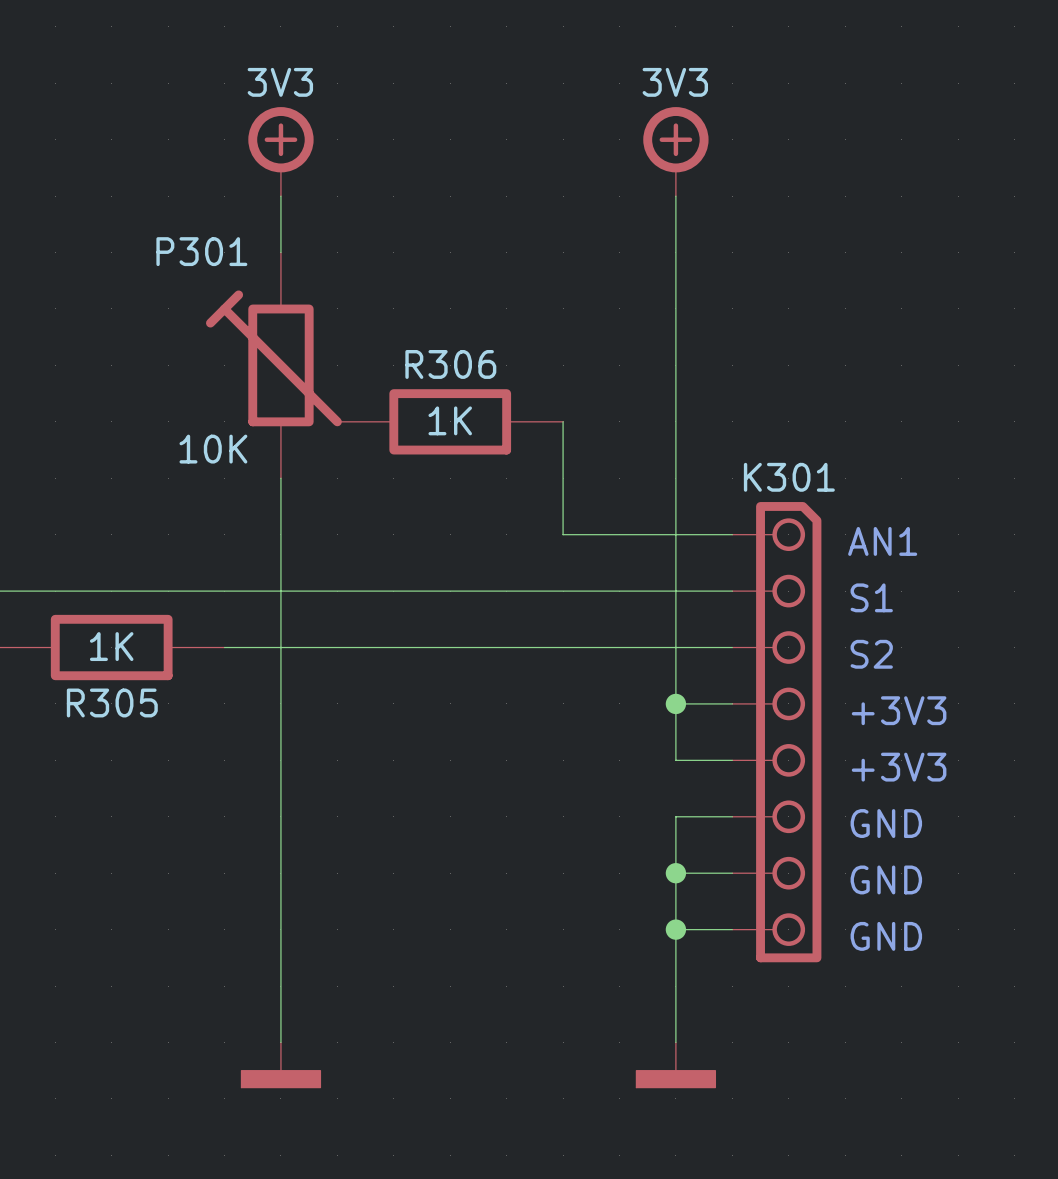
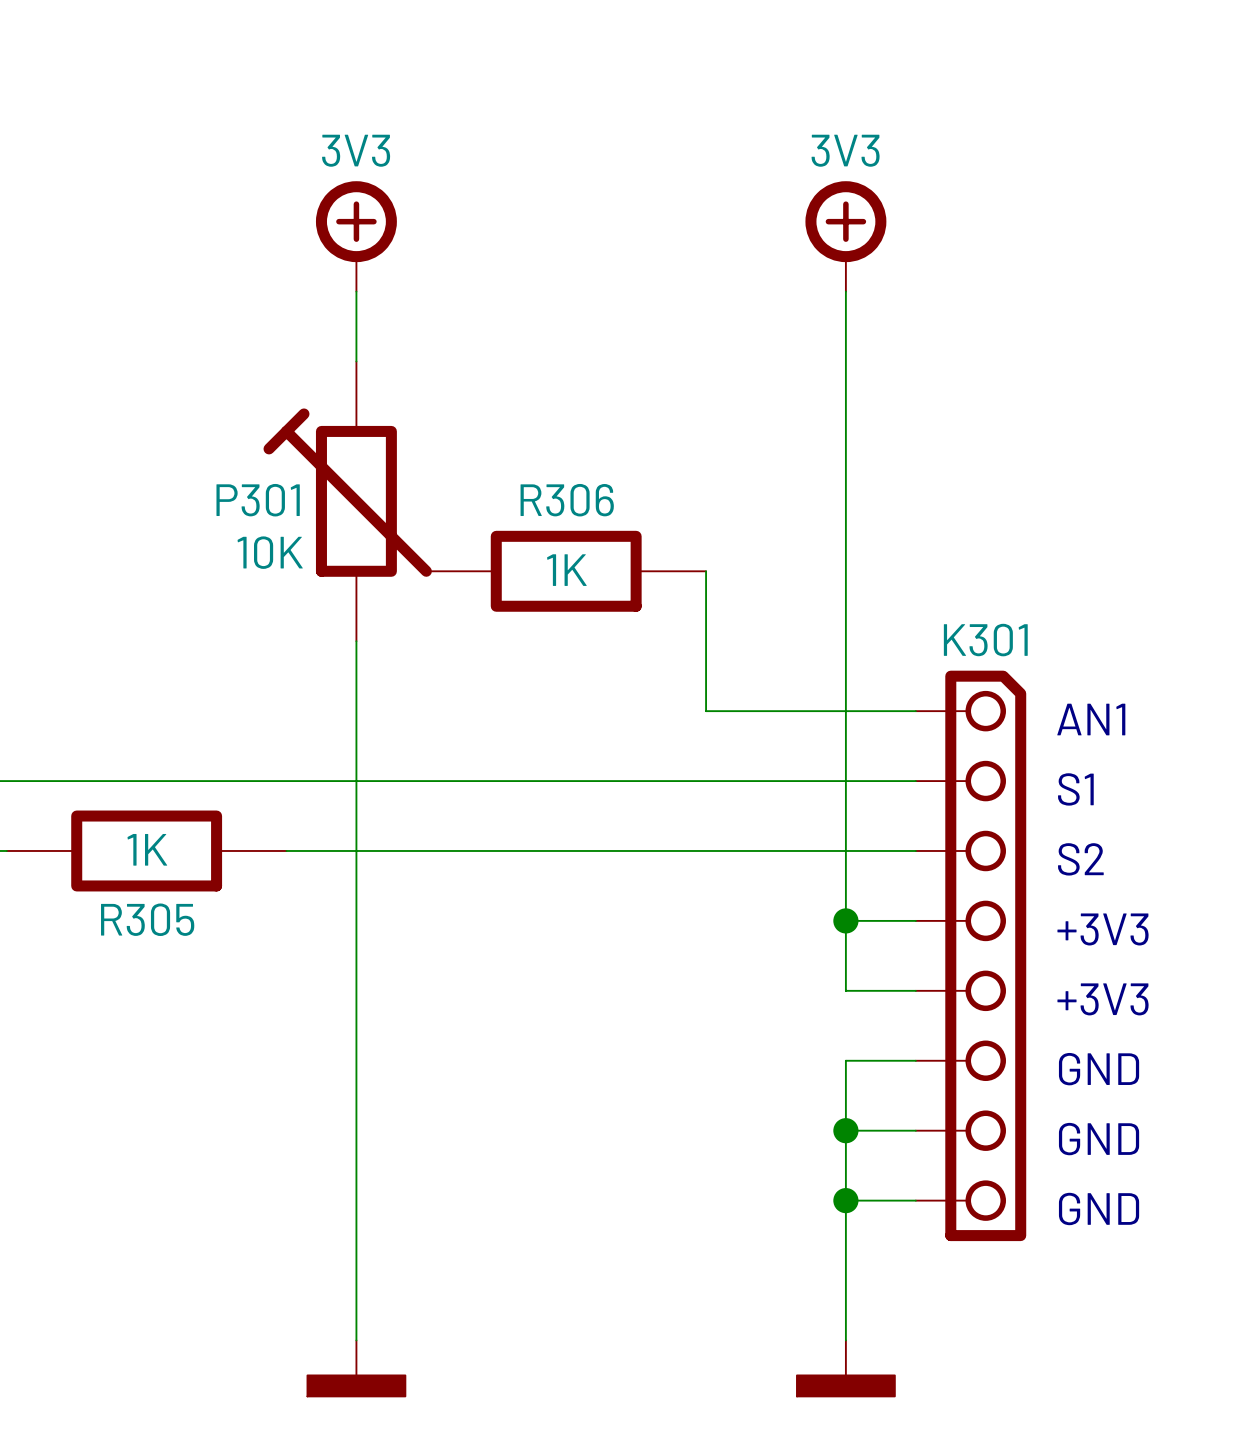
P301 name position: P301 (201, 251) -> P301 (258, 500)
P301 value position: 10K (213, 449) -> 10K (270, 552)

